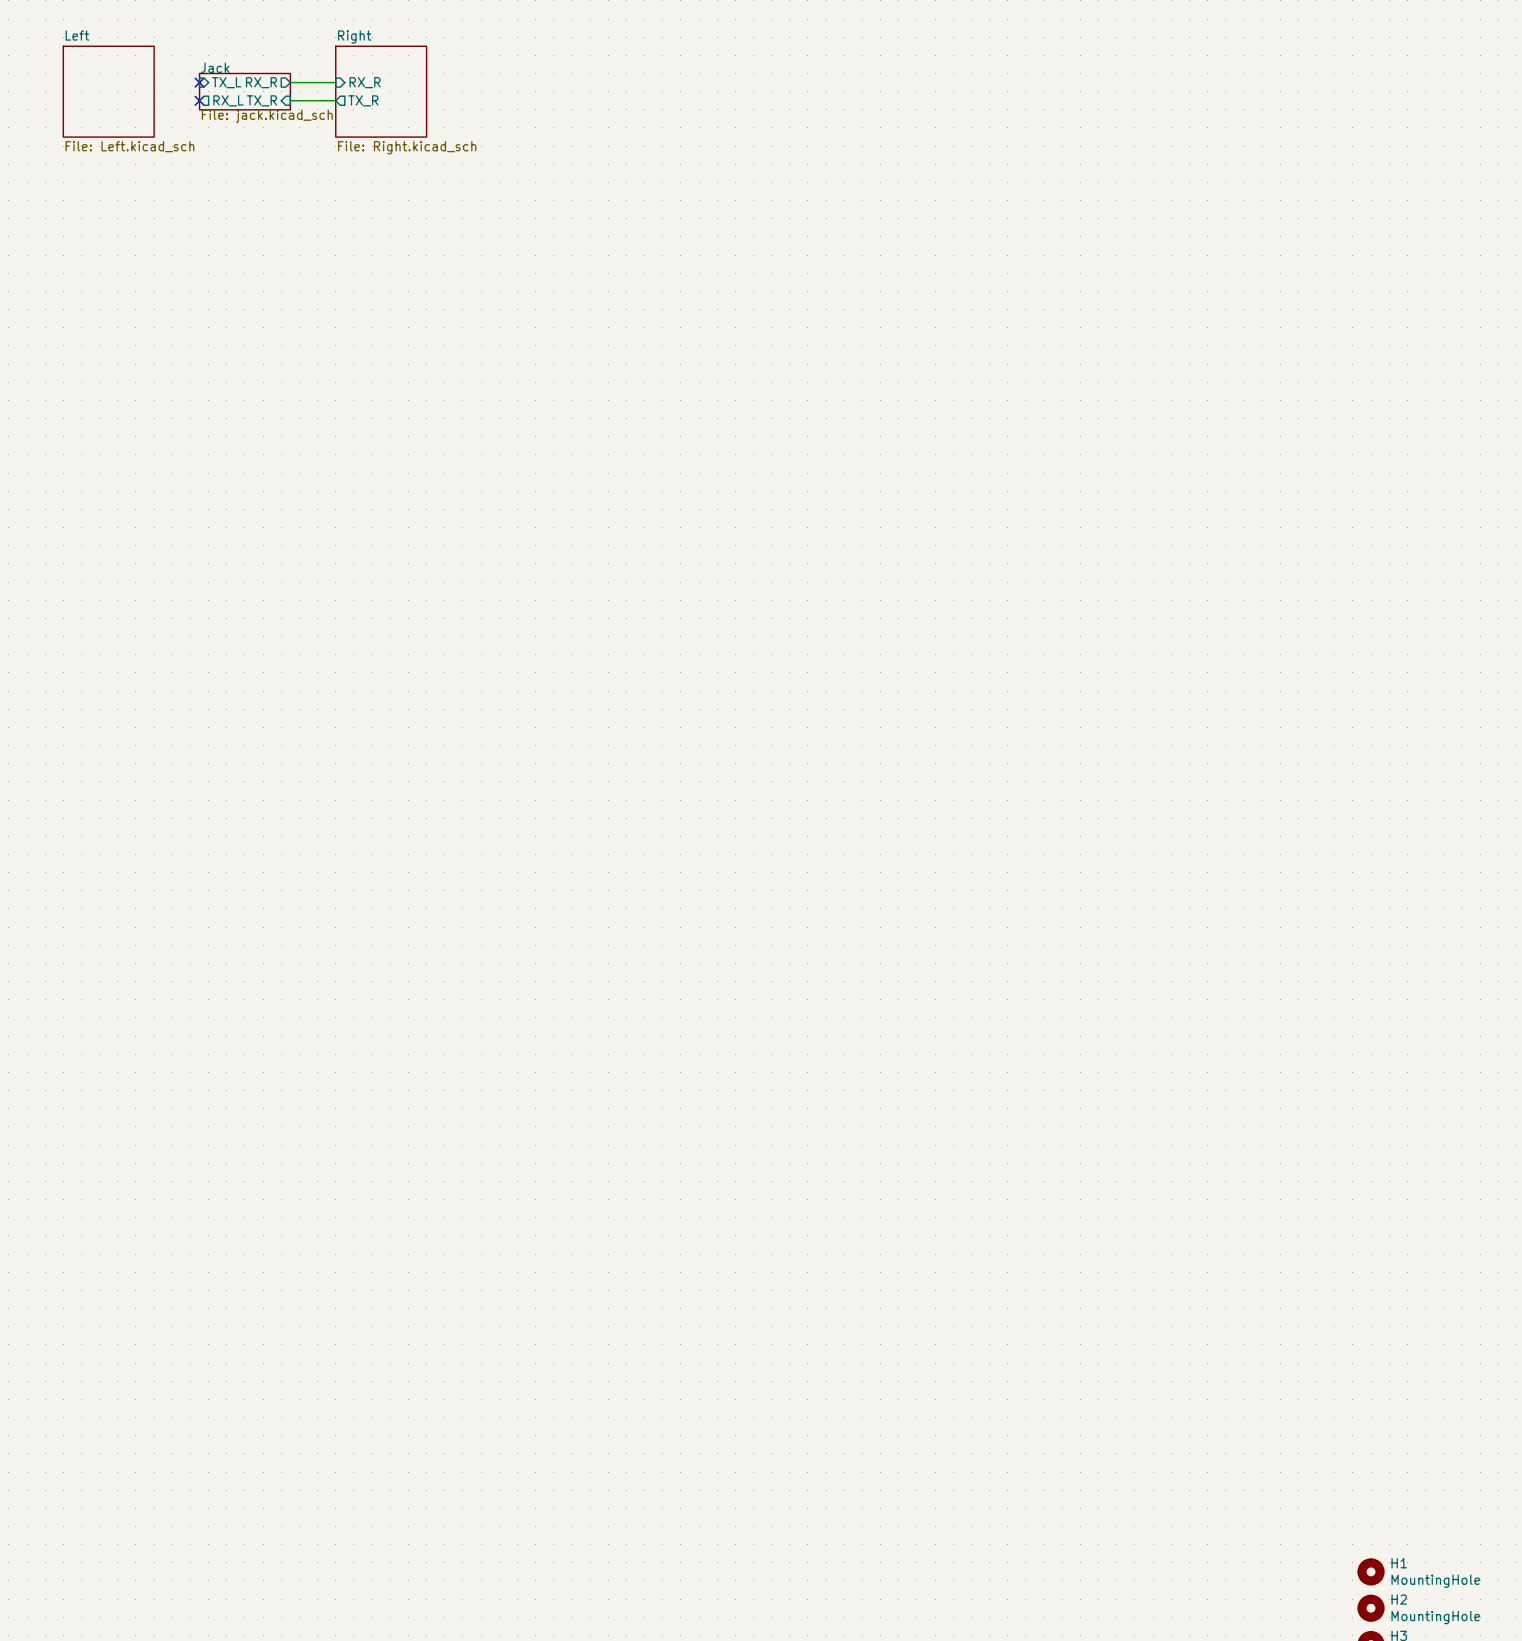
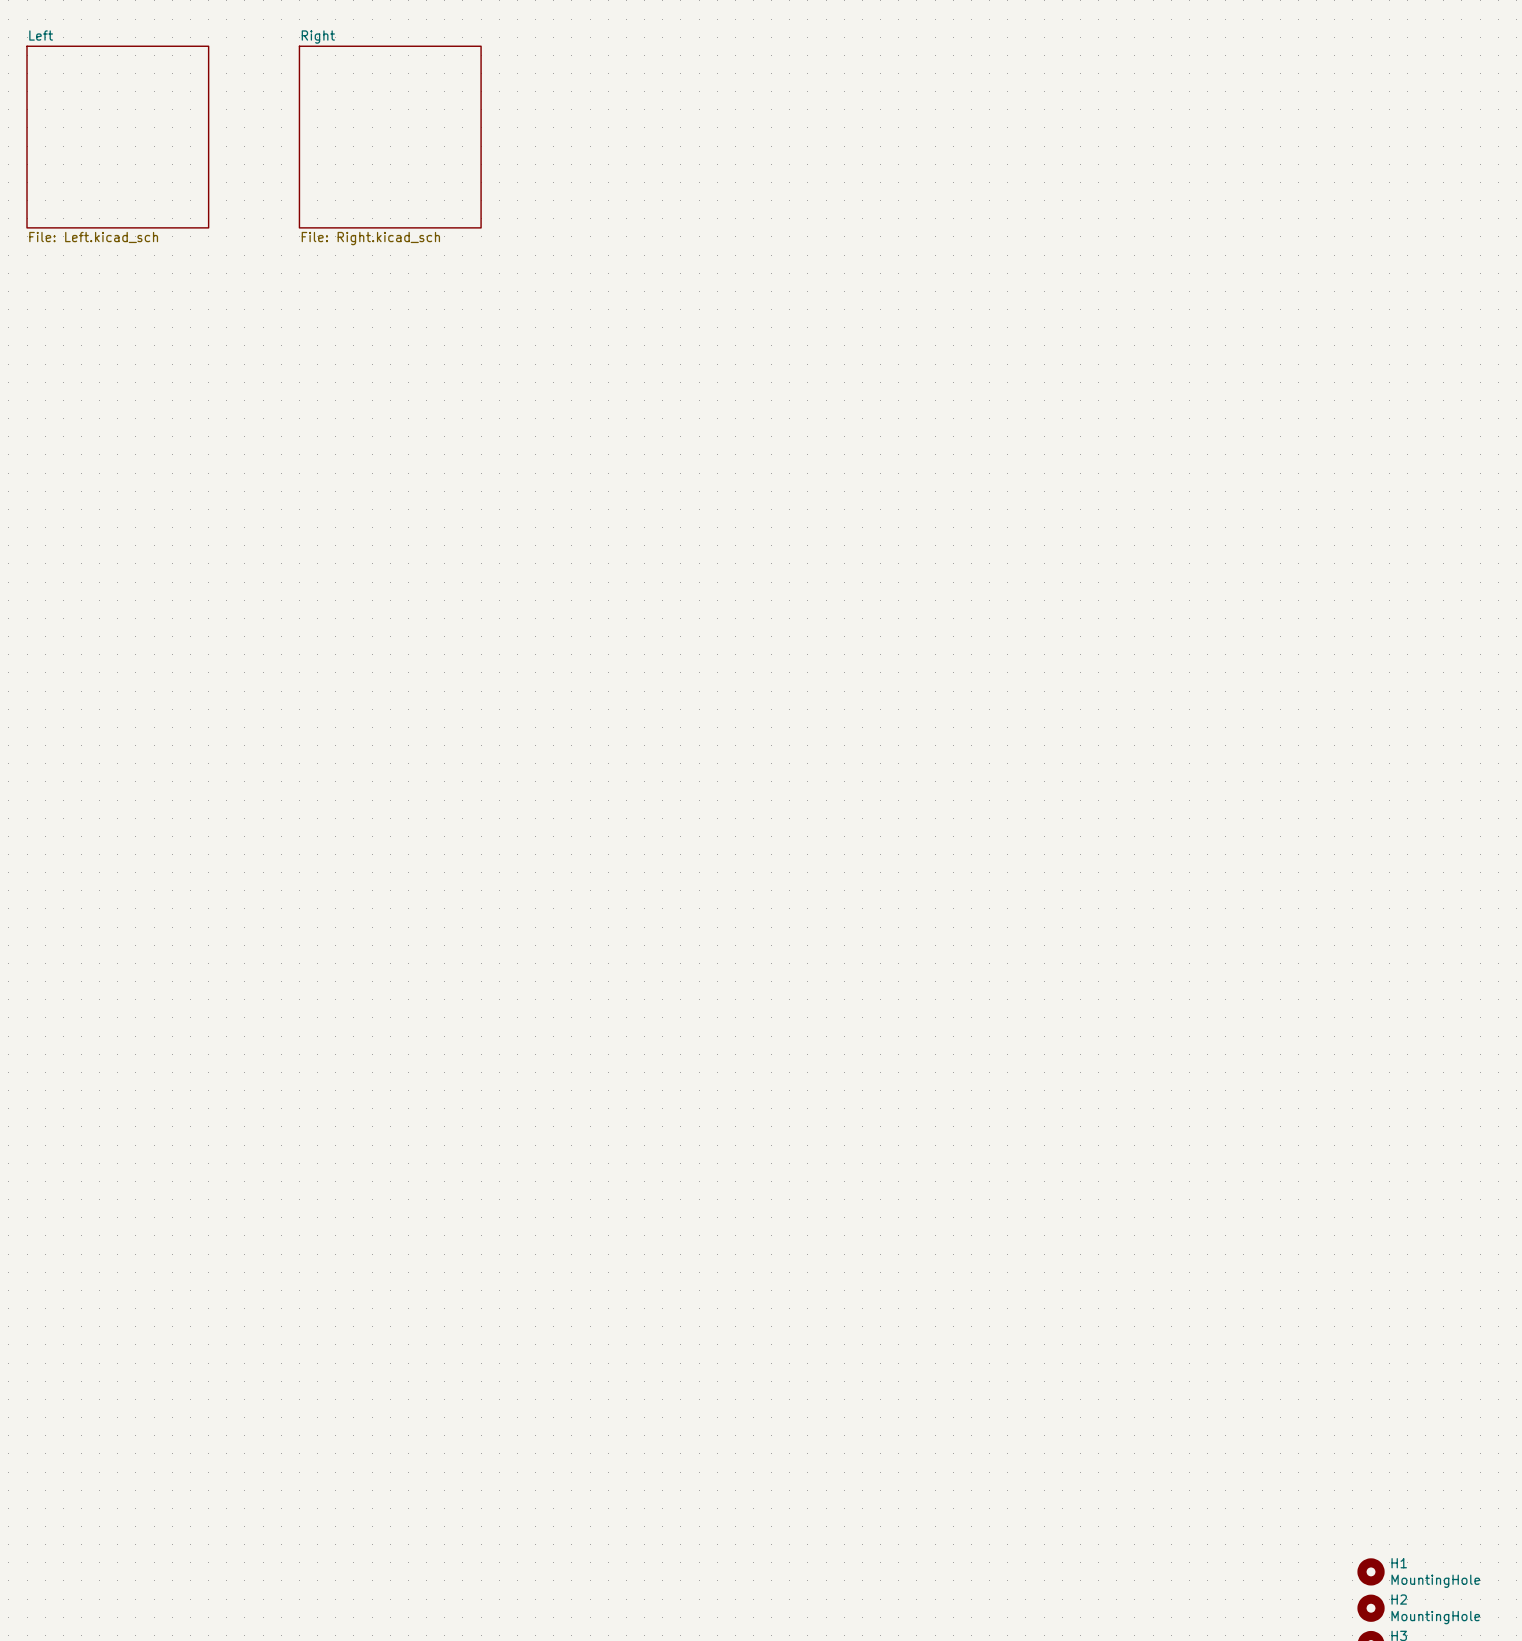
no-connect mark: (199, 82) -> none
sheet pin: TX_L (226, 82) -> none
sheet pin: RX_R (261, 82) -> none
wire: (290, 82) (335, 82) -> none
sheet pin: RX_R (365, 82) -> none
sheet Left: File: Left.kicad_sch (108, 91) -> none
sheet Jack: File: jack.kicad_sch (244, 91) -> none
sheet Right: File: Right.kicad_sch (381, 91) -> none
no-connect mark: (199, 100) -> none
sheet pin: RX_L (228, 100) -> none
sheet pin: TX_R (261, 100) -> none
wire: (290, 100) (335, 100) -> none
sheet pin: TX_R (363, 100) -> none
sheet Left: none -> File: Left.kicad_sch (117, 137)
sheet Right: none -> File: Right.kicad_sch (390, 137)

